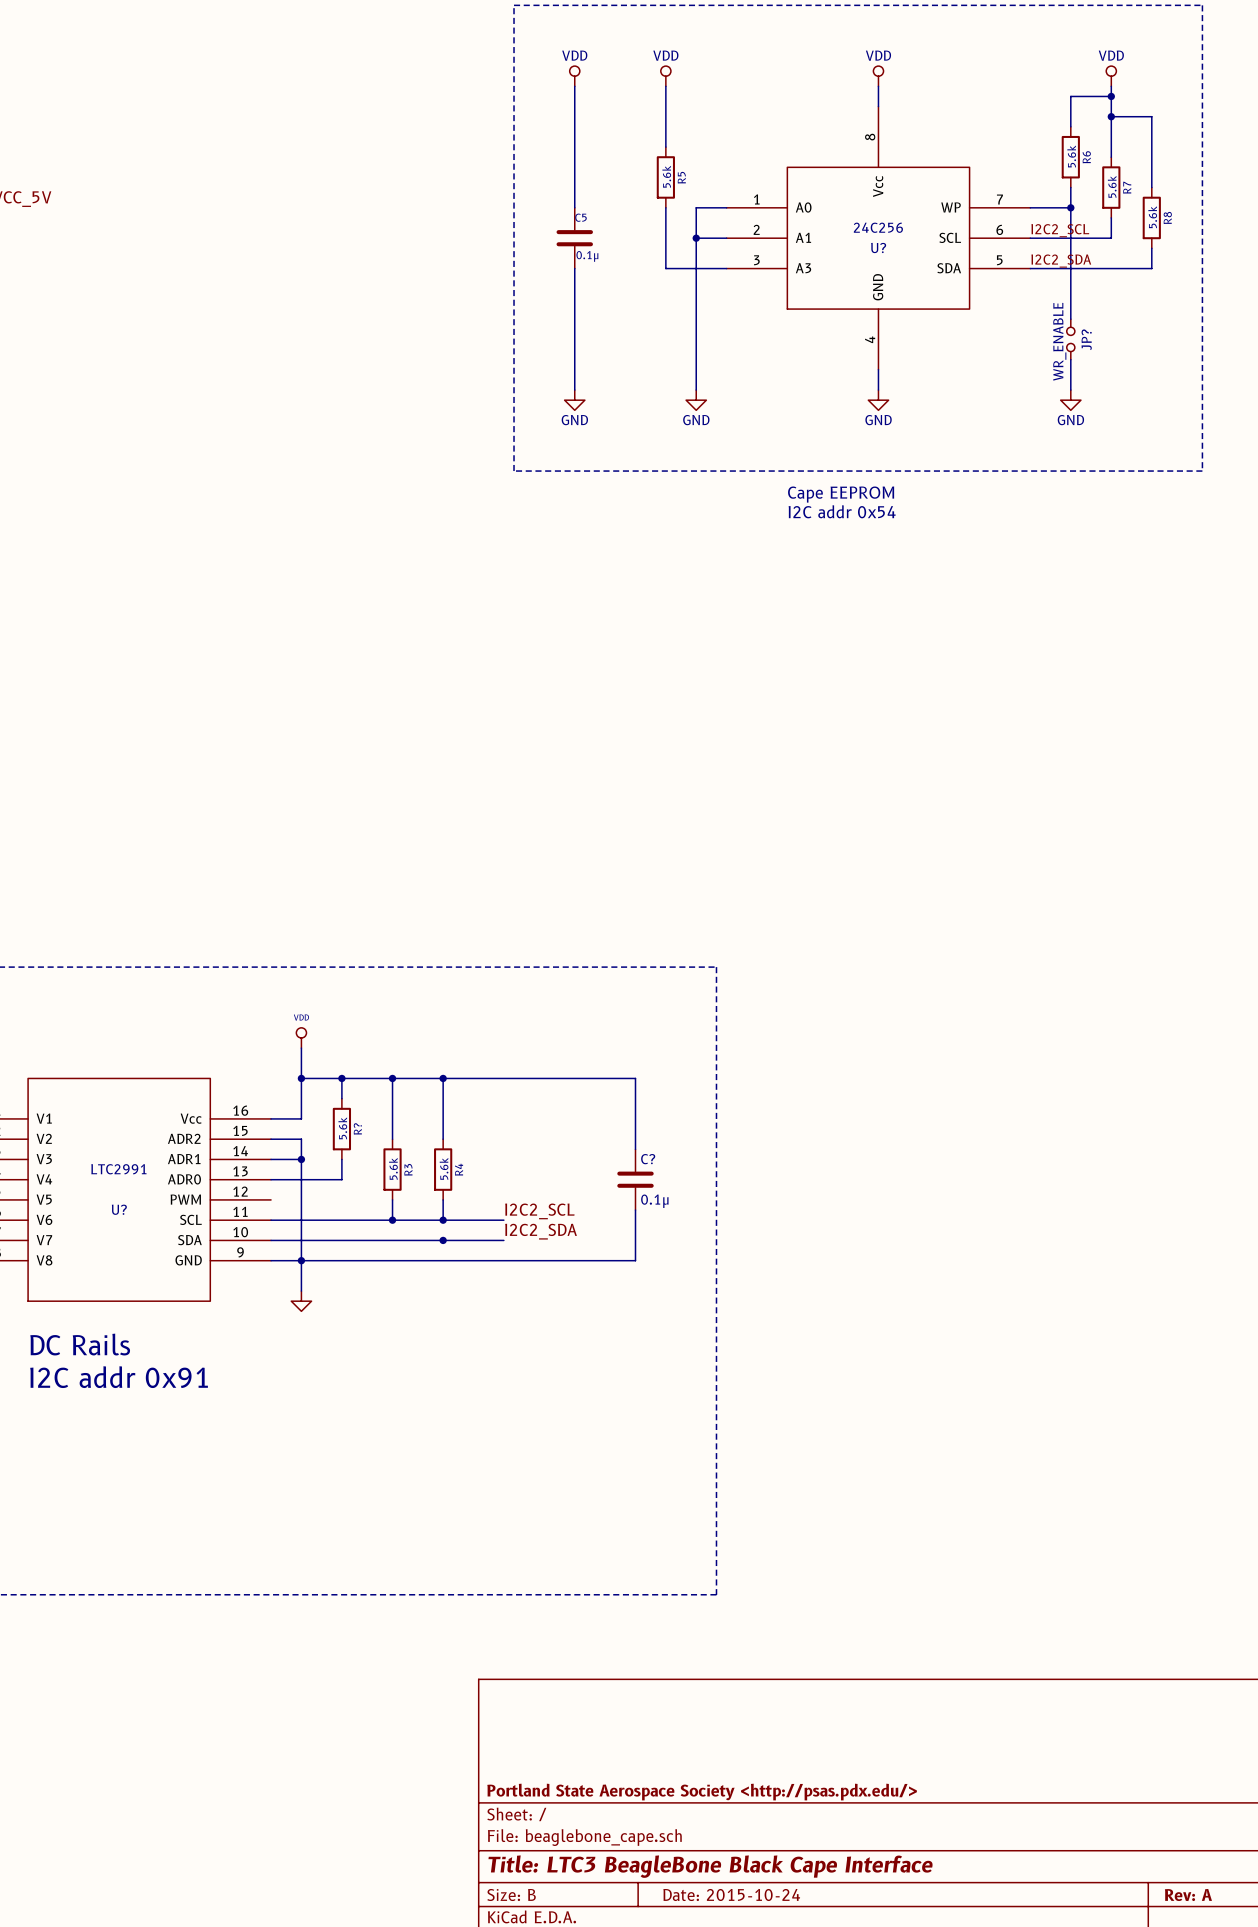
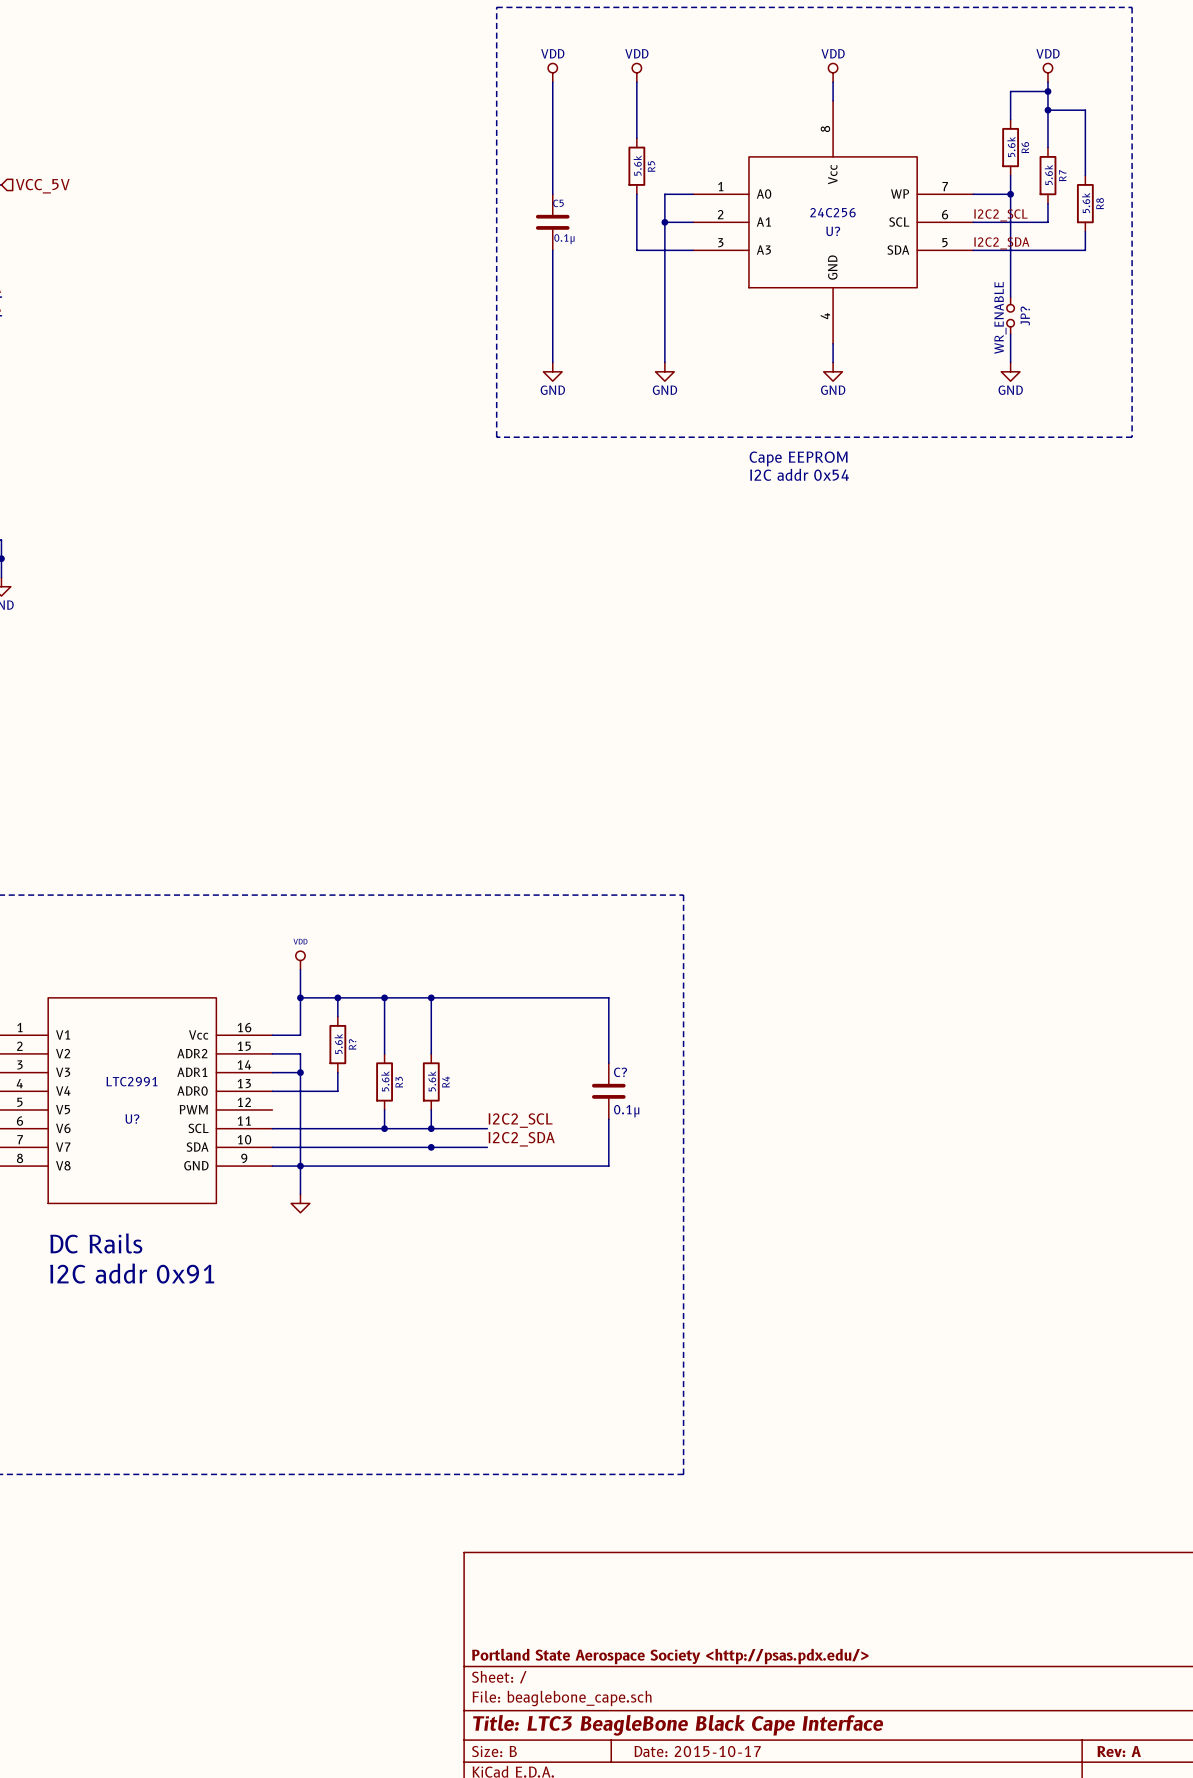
title block: Date: 2015-10-24 (731, 1894) -> Date: 2015-10-17 (697, 1751)

